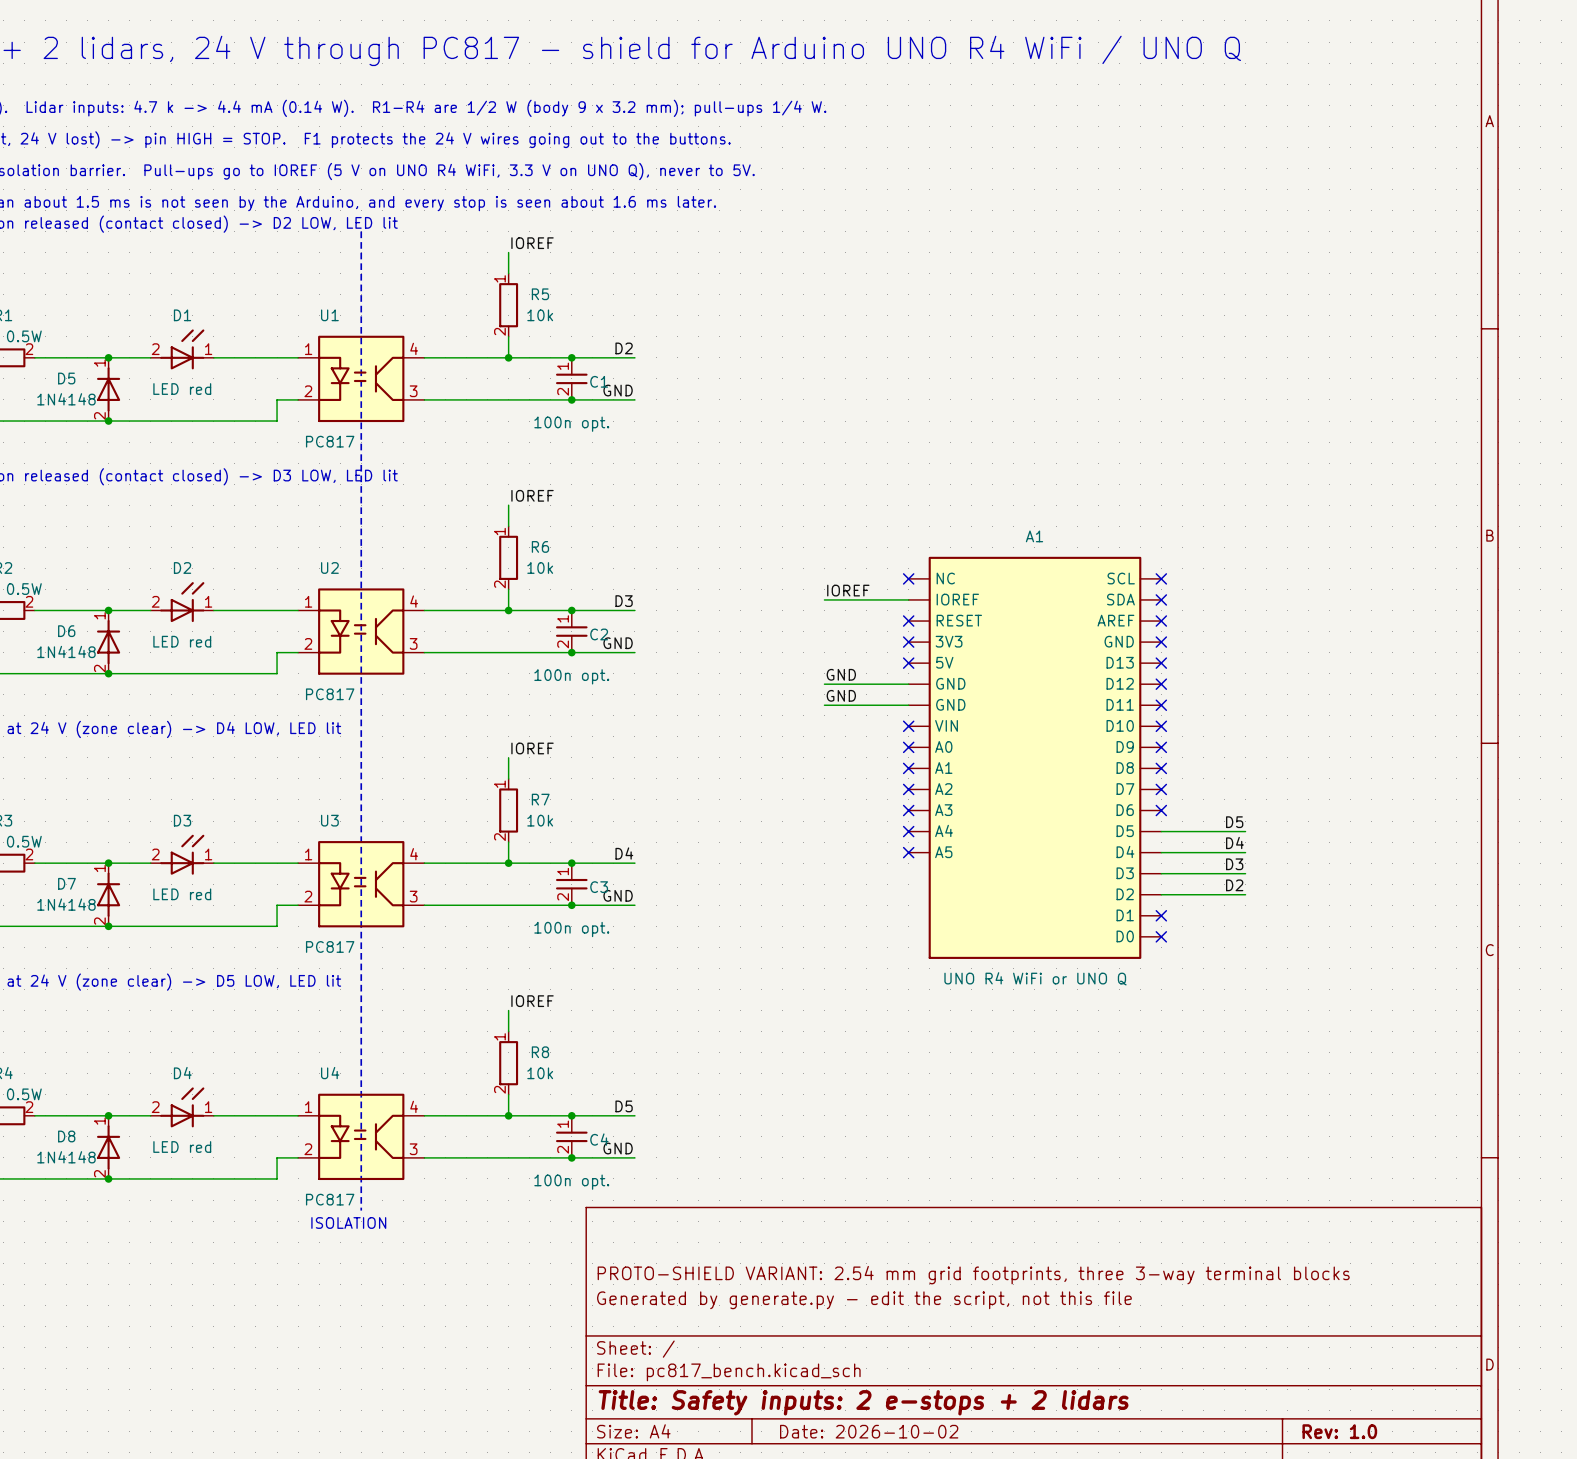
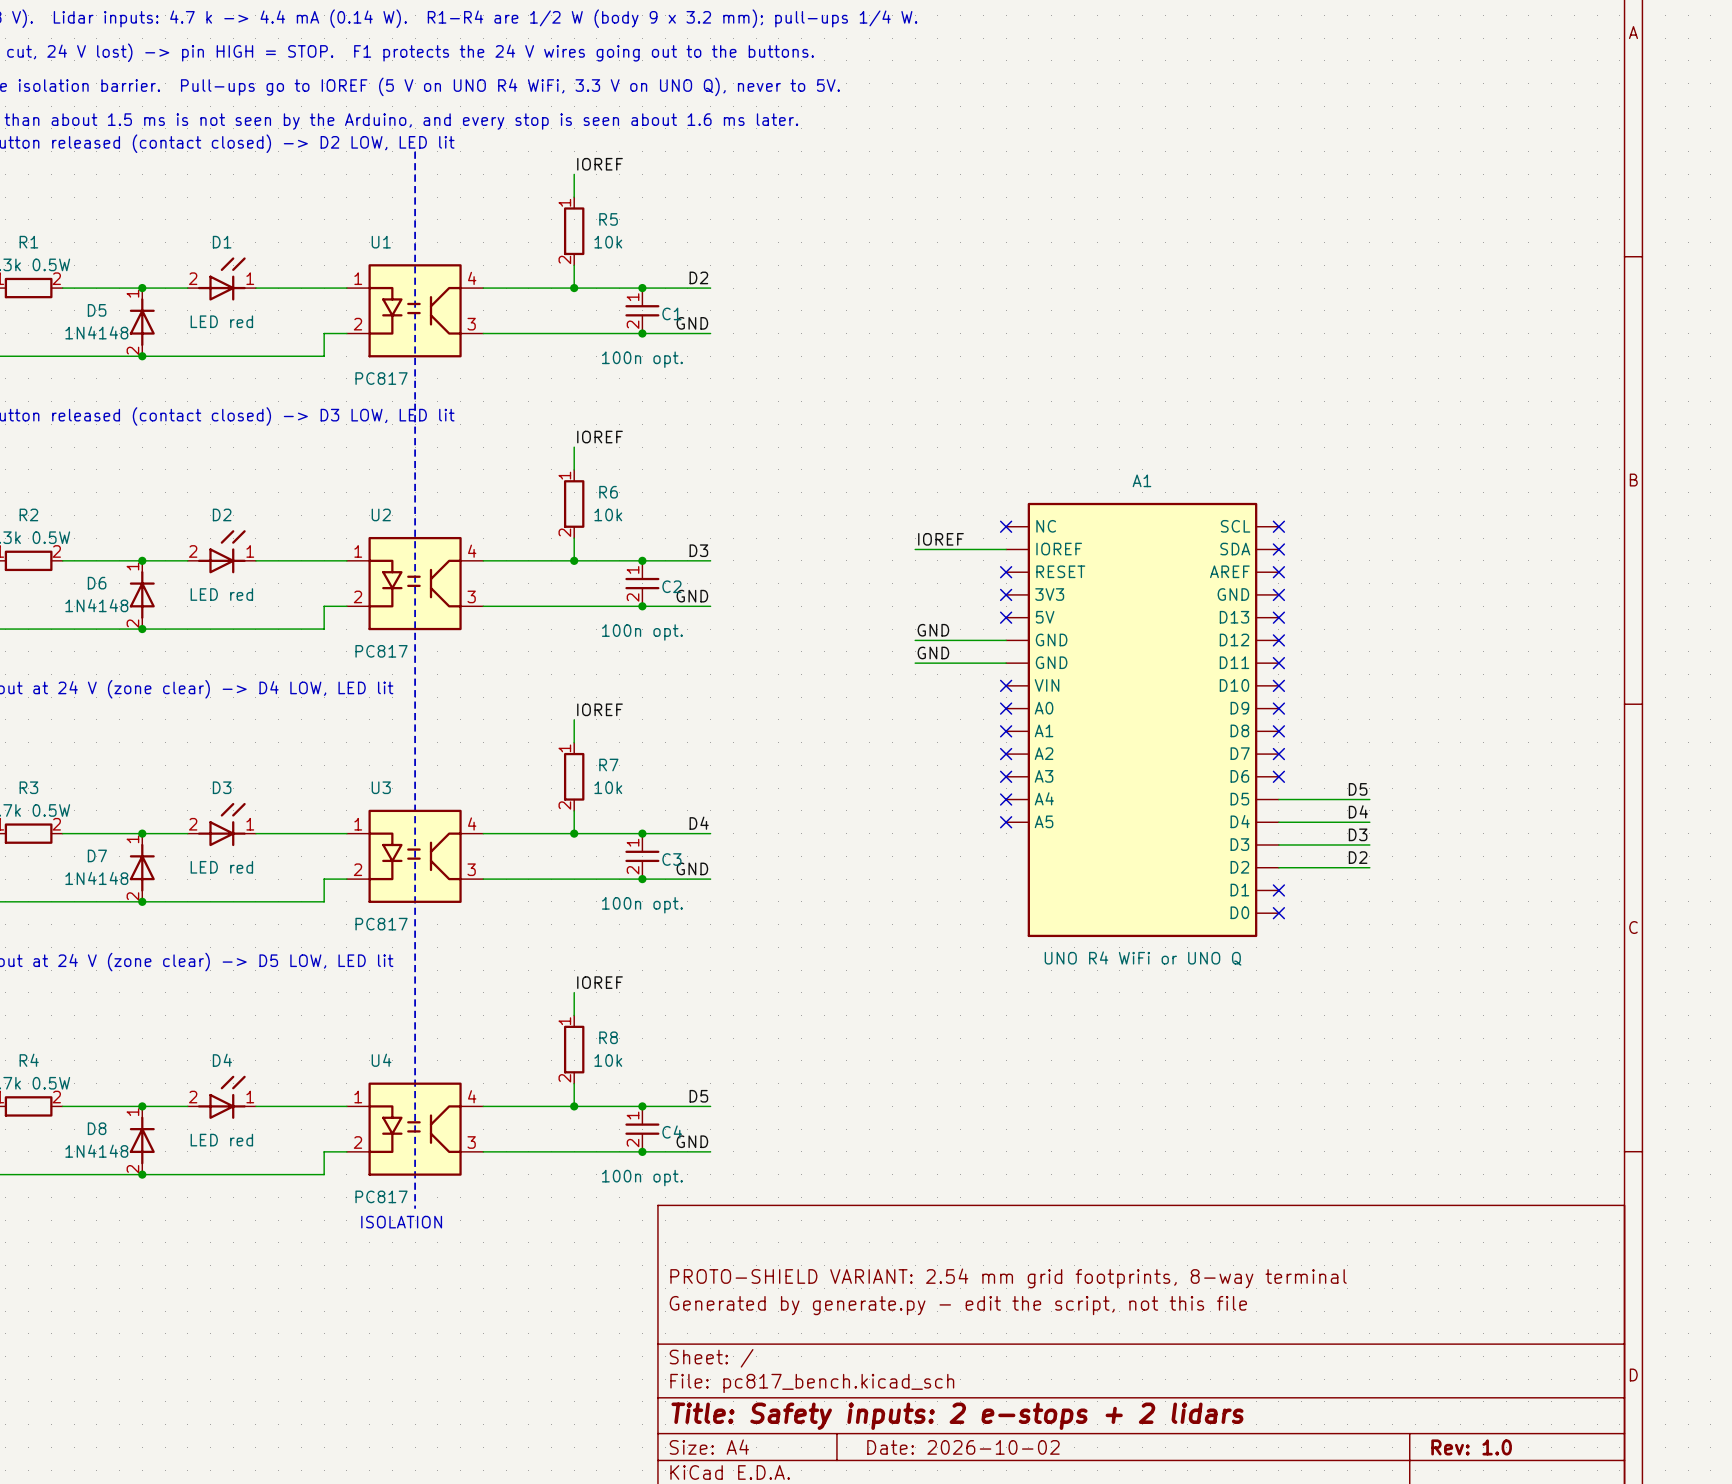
title block: PROTO-SHIELD VARIANT: 2.54 mm grid footprints, three 3-way terminal blocks (973, 1275) -> PROTO-SHIELD VARIANT: 2.54 mm grid footprints, 8-way terminal (1008, 1278)

